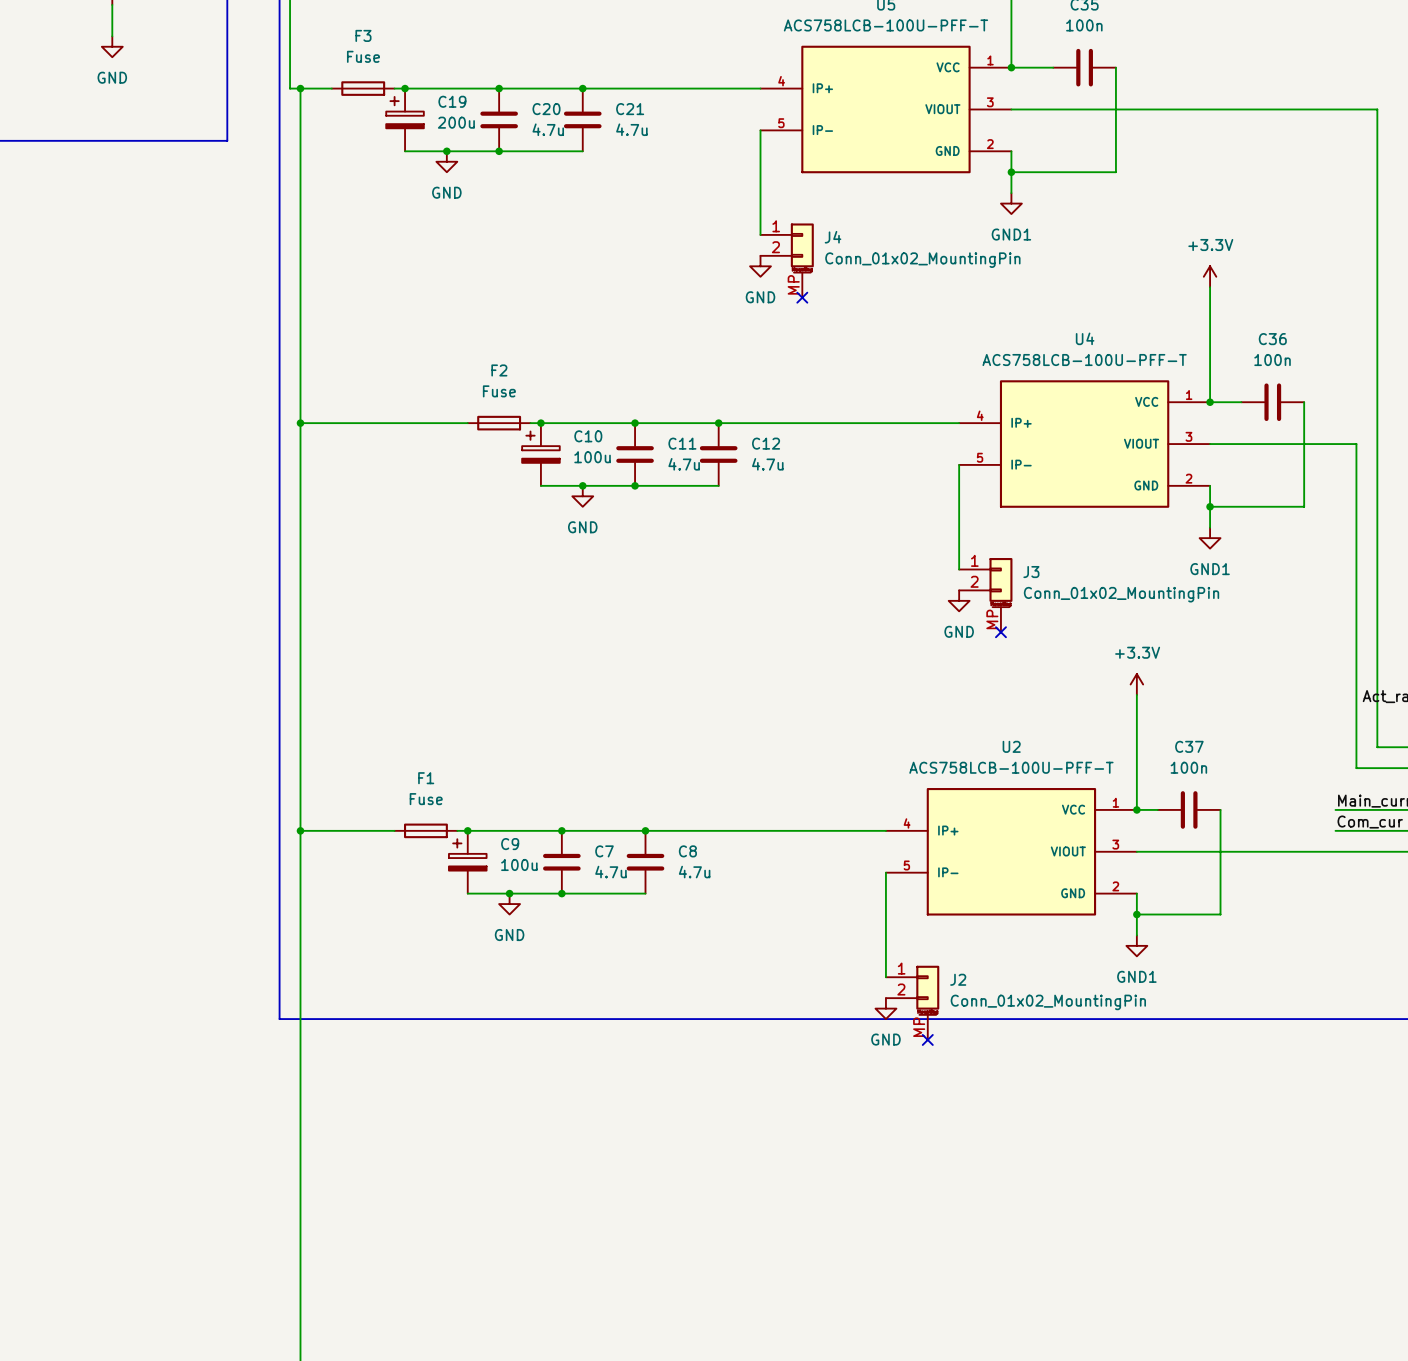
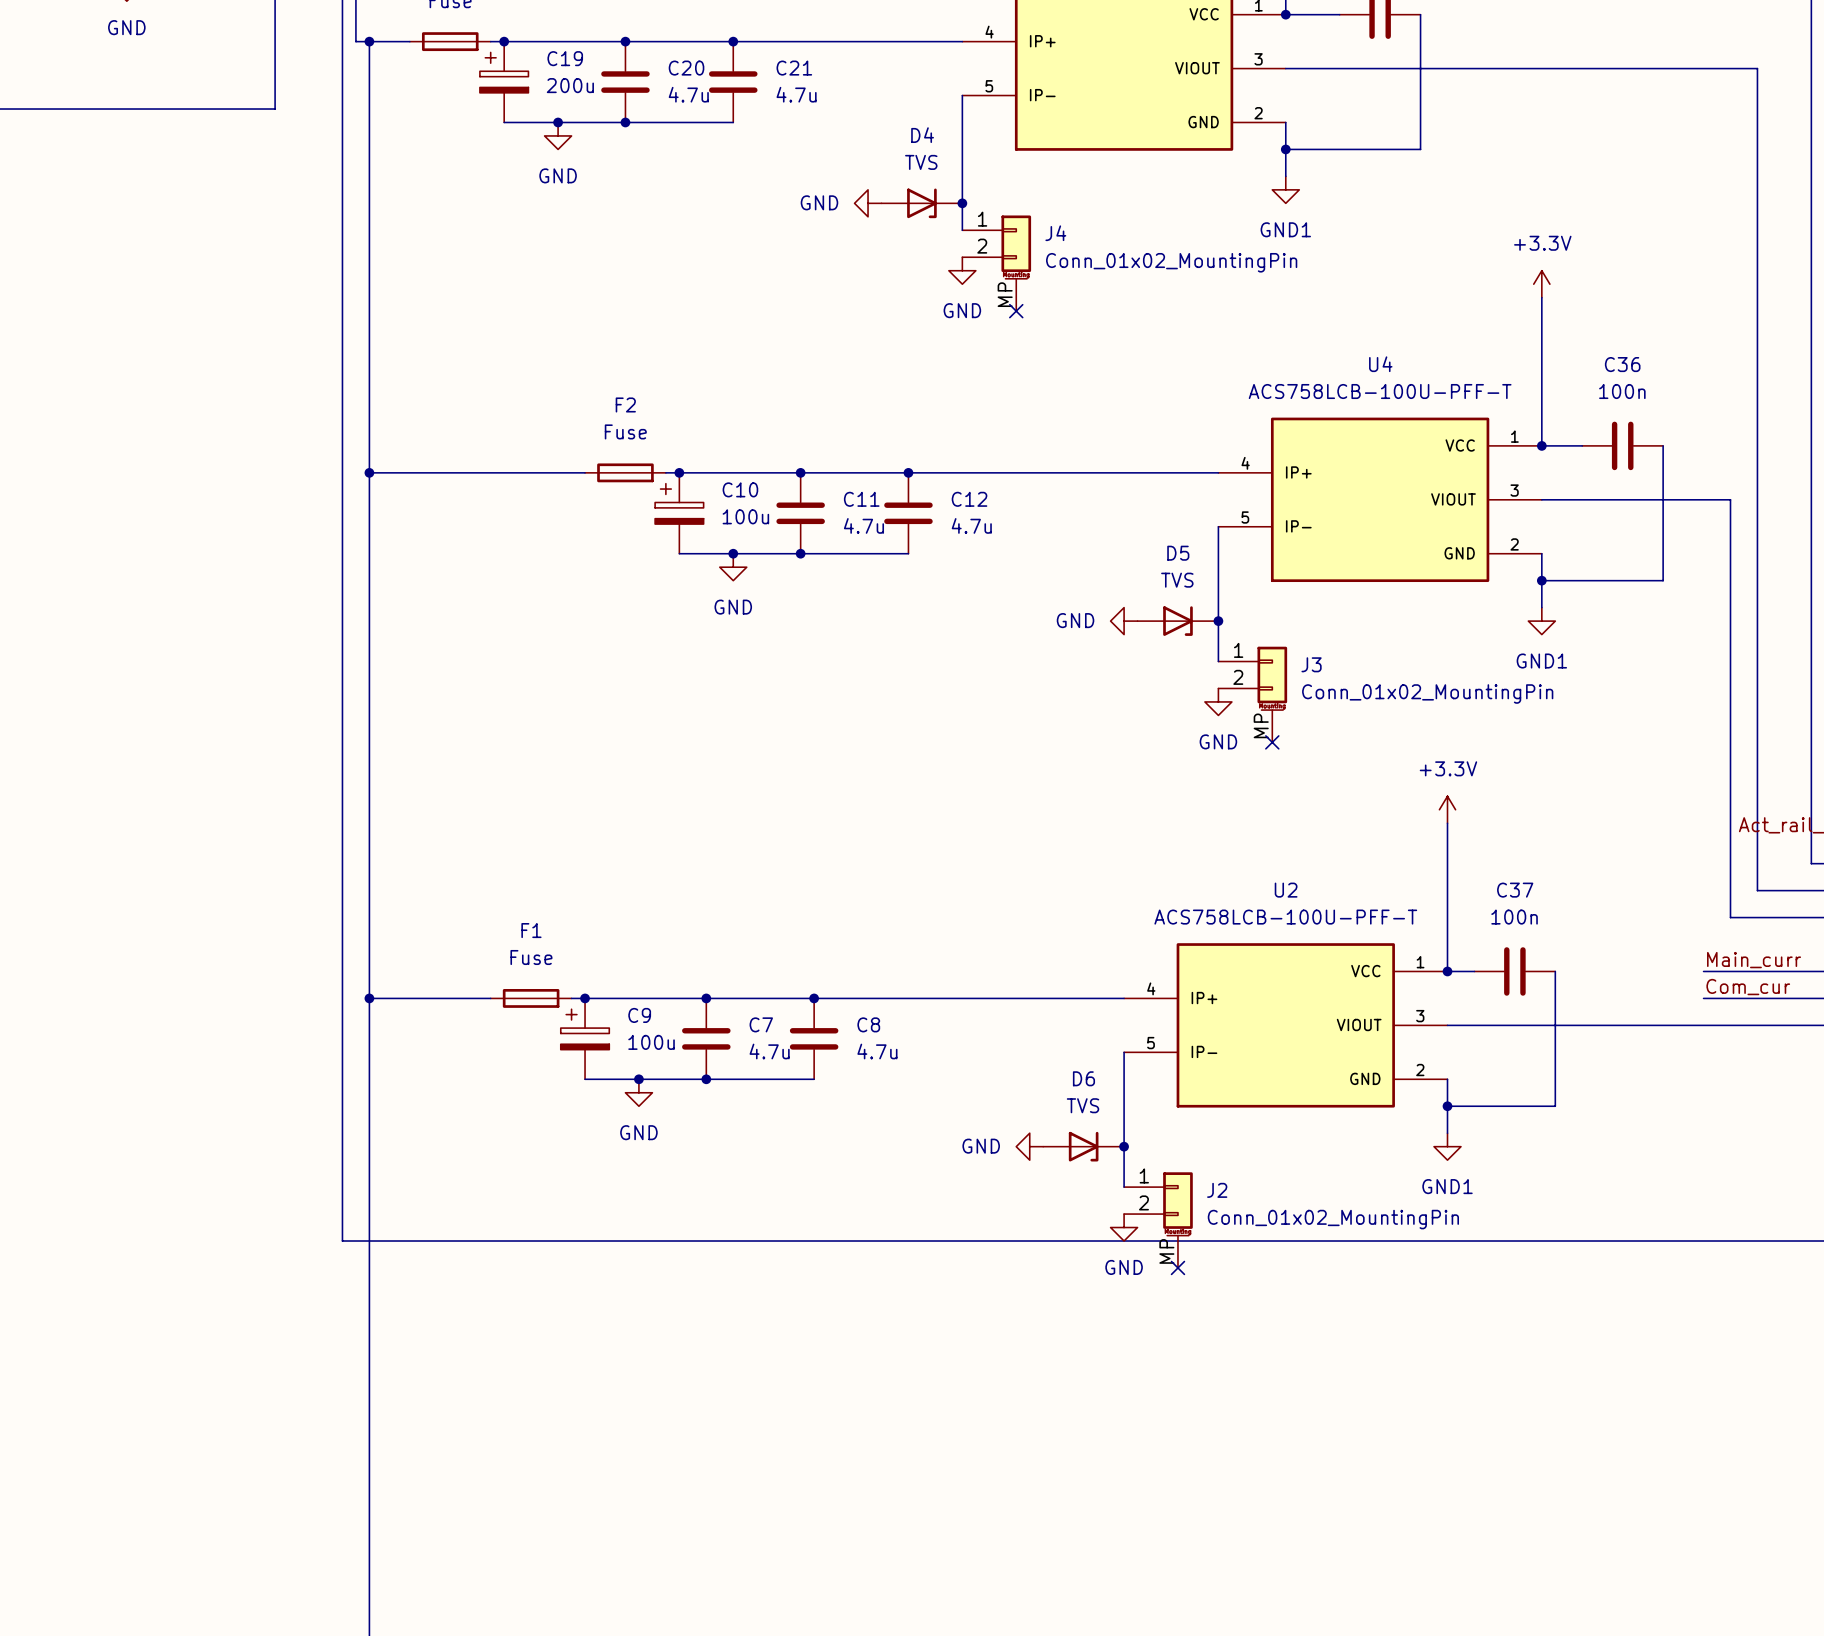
power symbol: none -> GND (868, 203)
D4: none -> TVS (921, 203)
junction: none -> (962, 203)
power symbol: none -> GND (1124, 621)
D5: none -> TVS (1177, 621)
junction: none -> (1218, 621)
power symbol: none -> GND (1029, 1146)
D6: none -> TVS (1083, 1146)
junction: none -> (1124, 1146)

